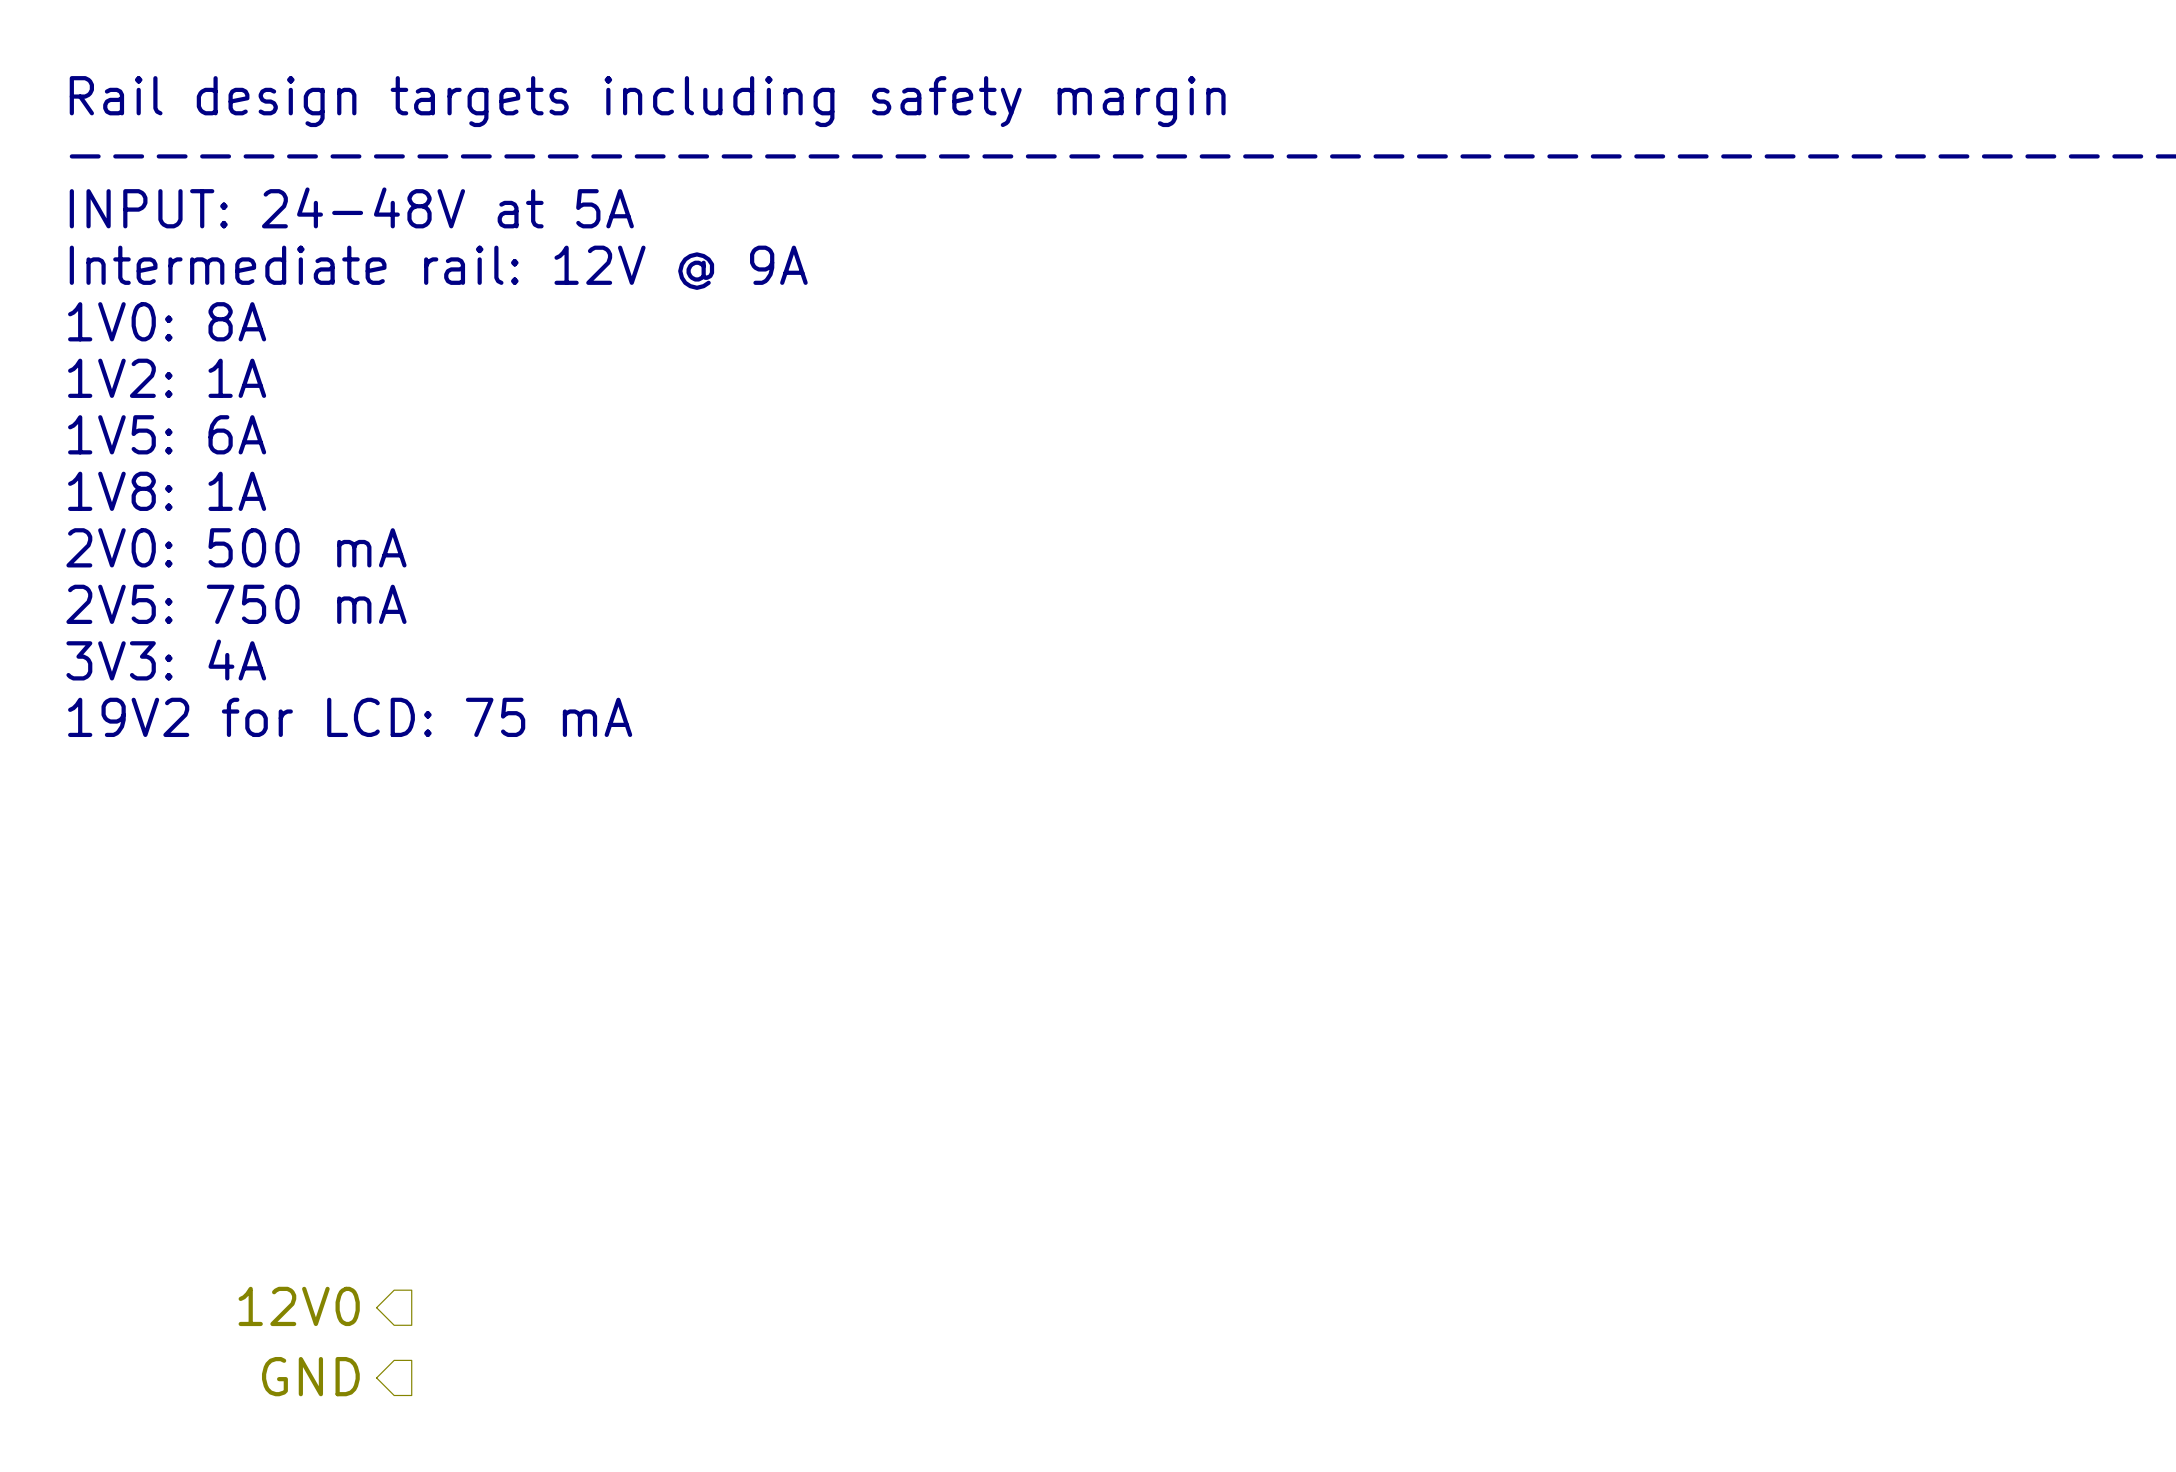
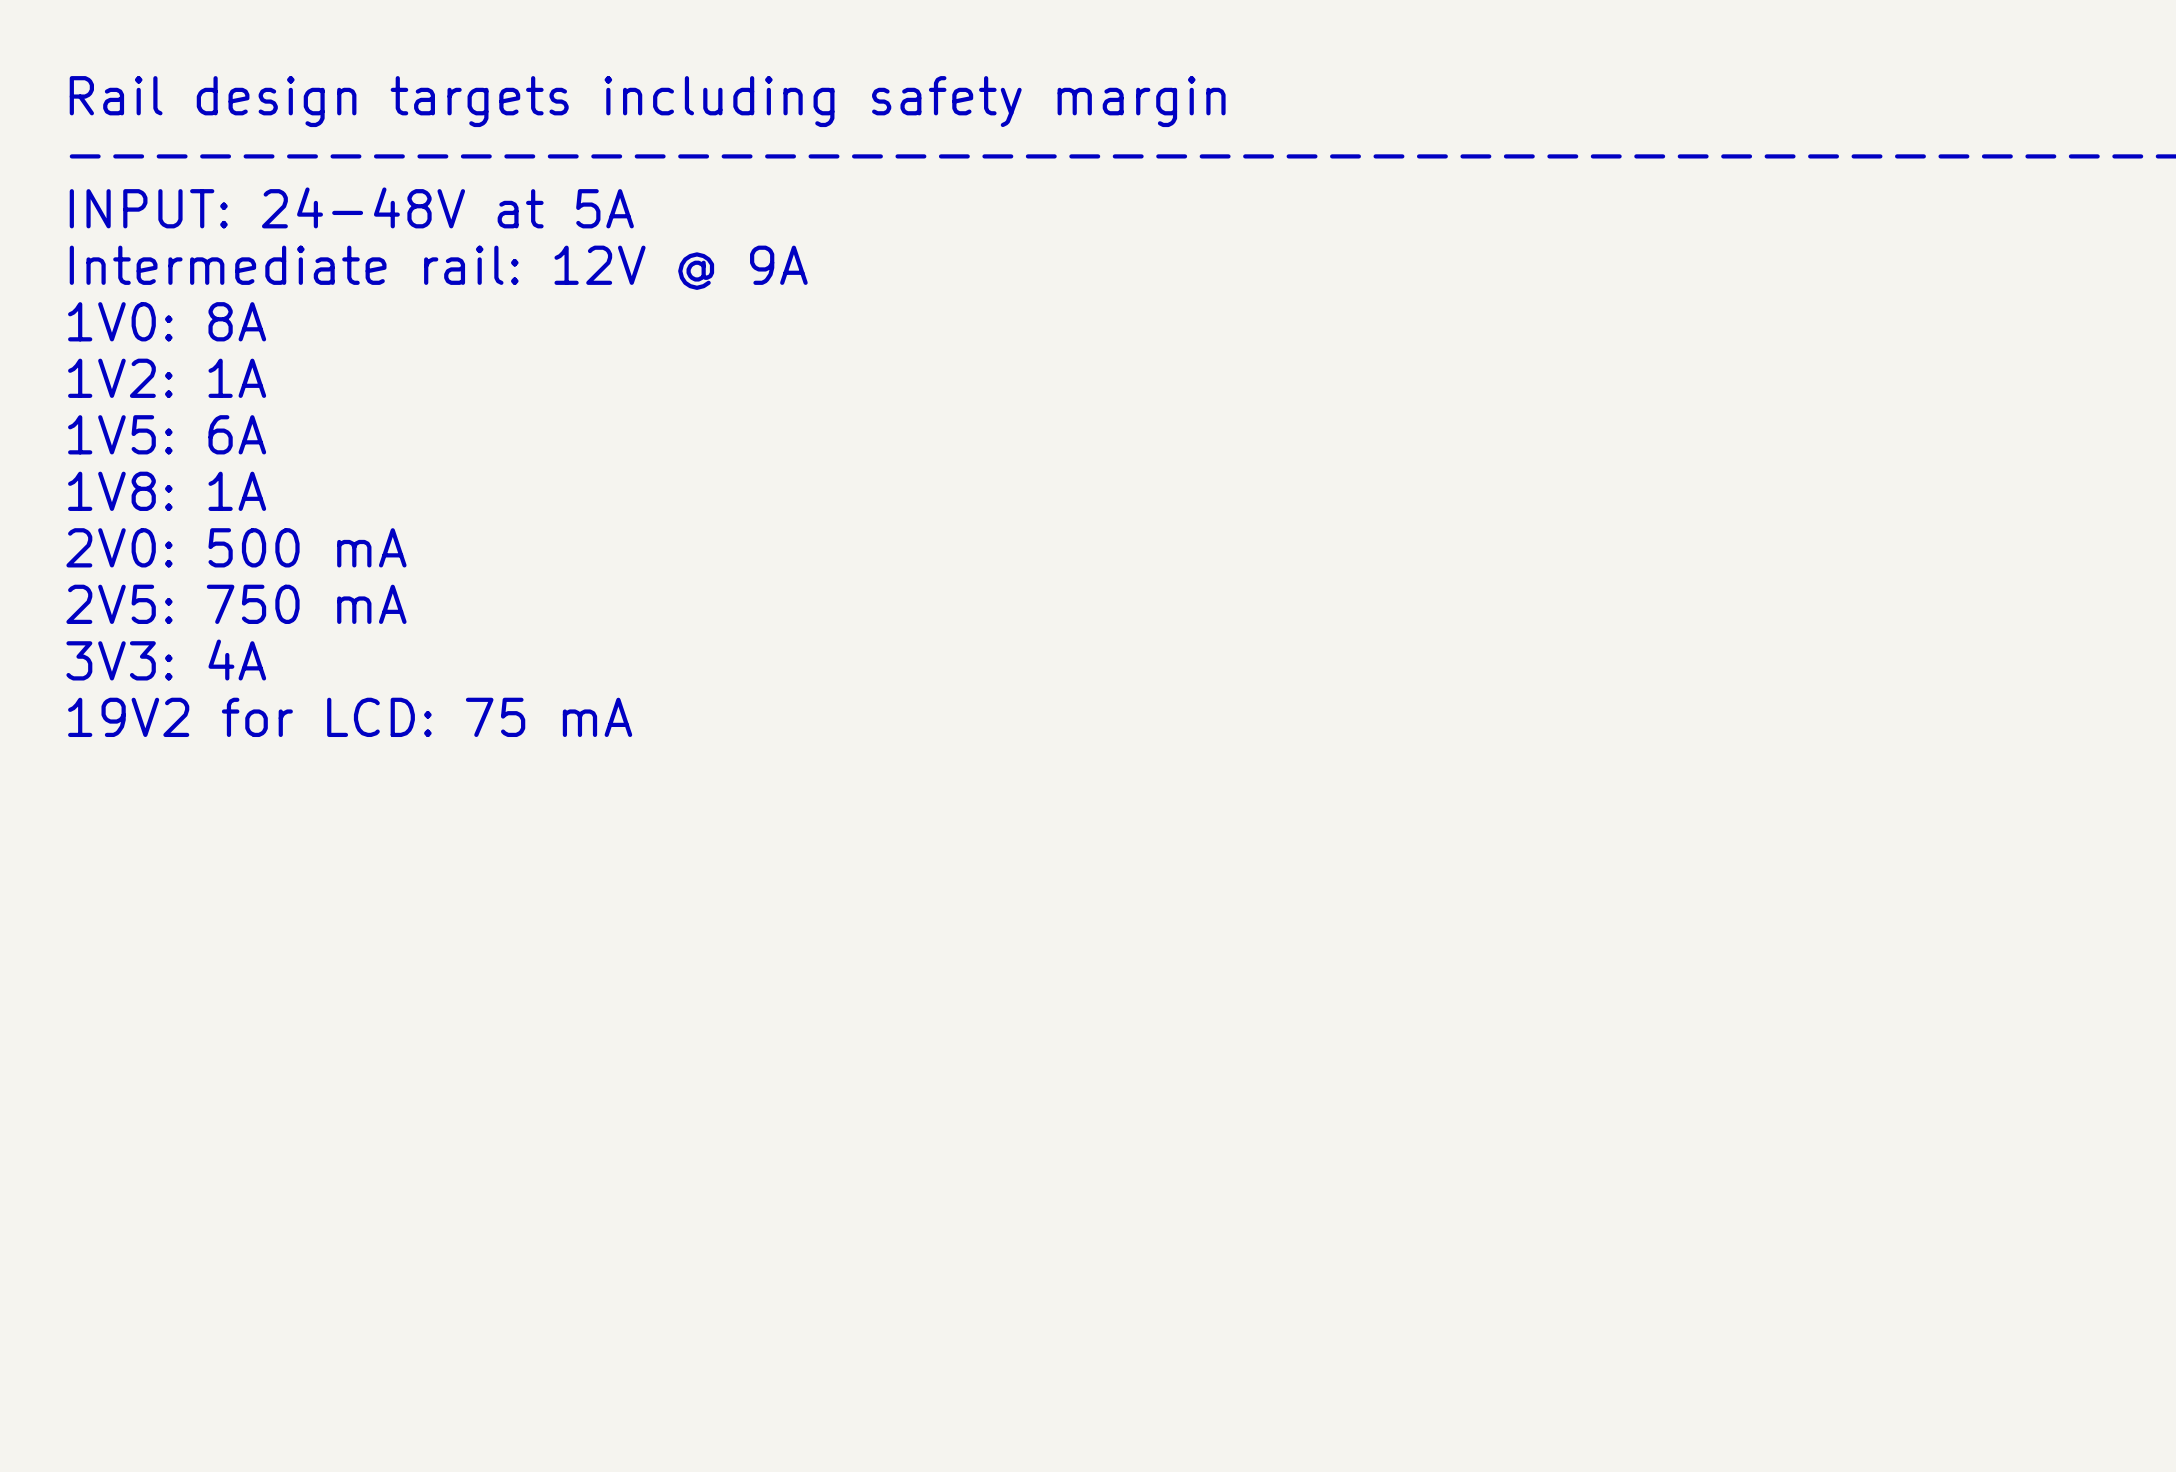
hierarchical label: 12V0 (299, 1306) -> none
hierarchical label: GND (310, 1376) -> none

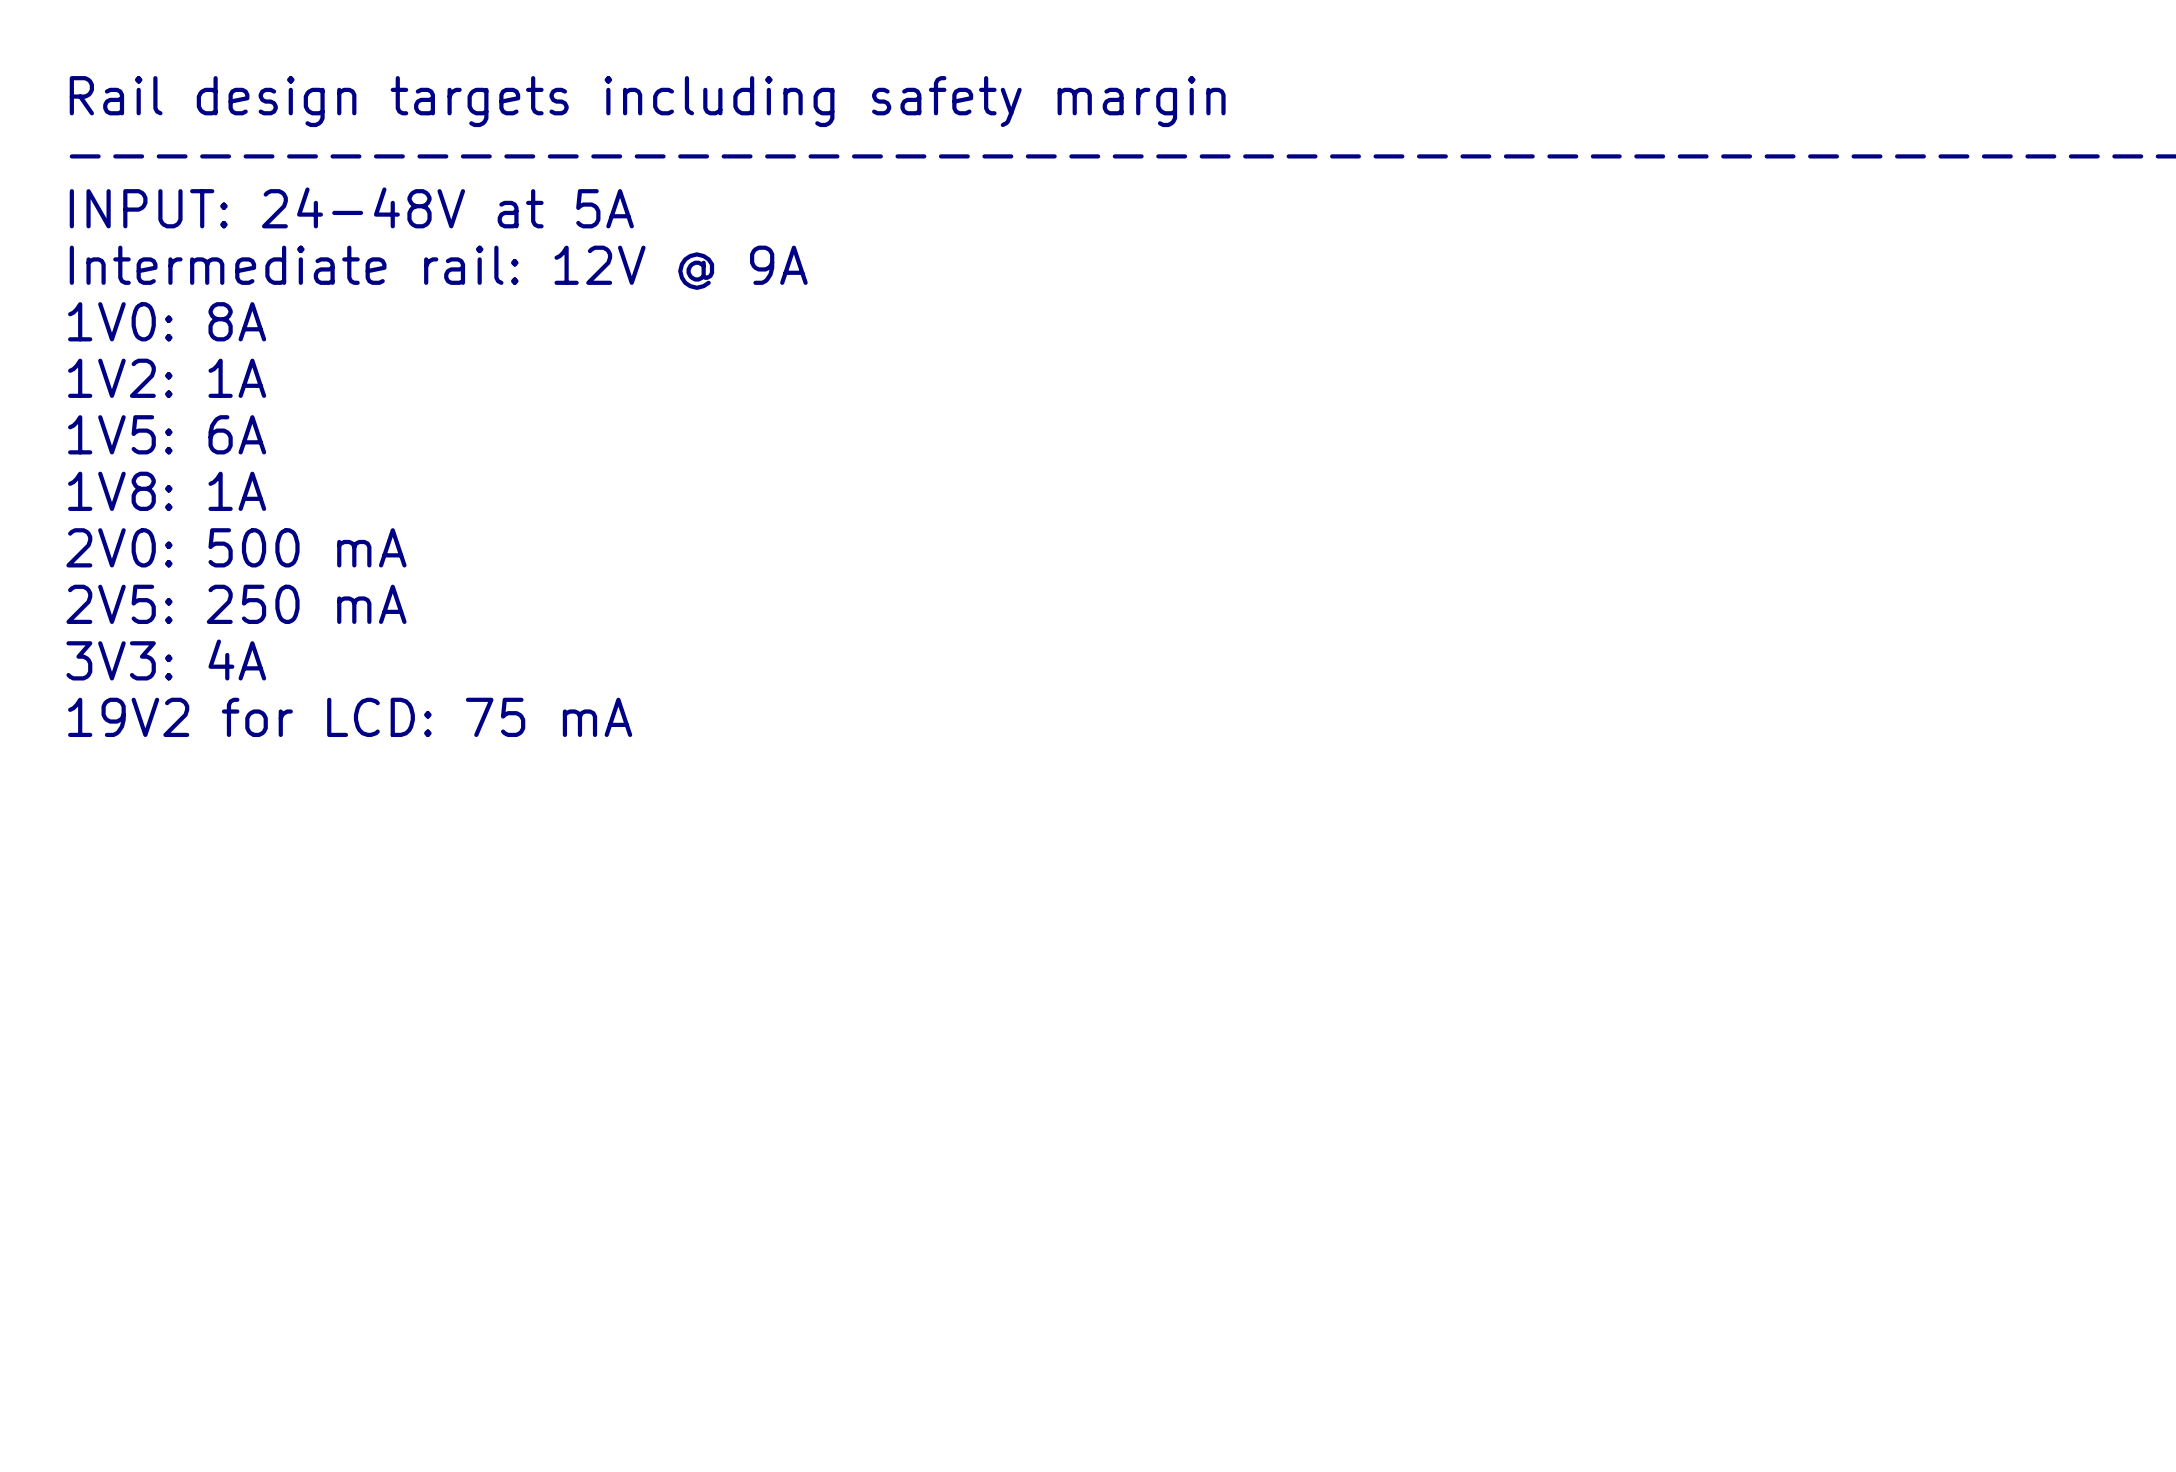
text: 2V5: 750 mA (236, 604) -> 2V5: 250 mA (236, 604)

